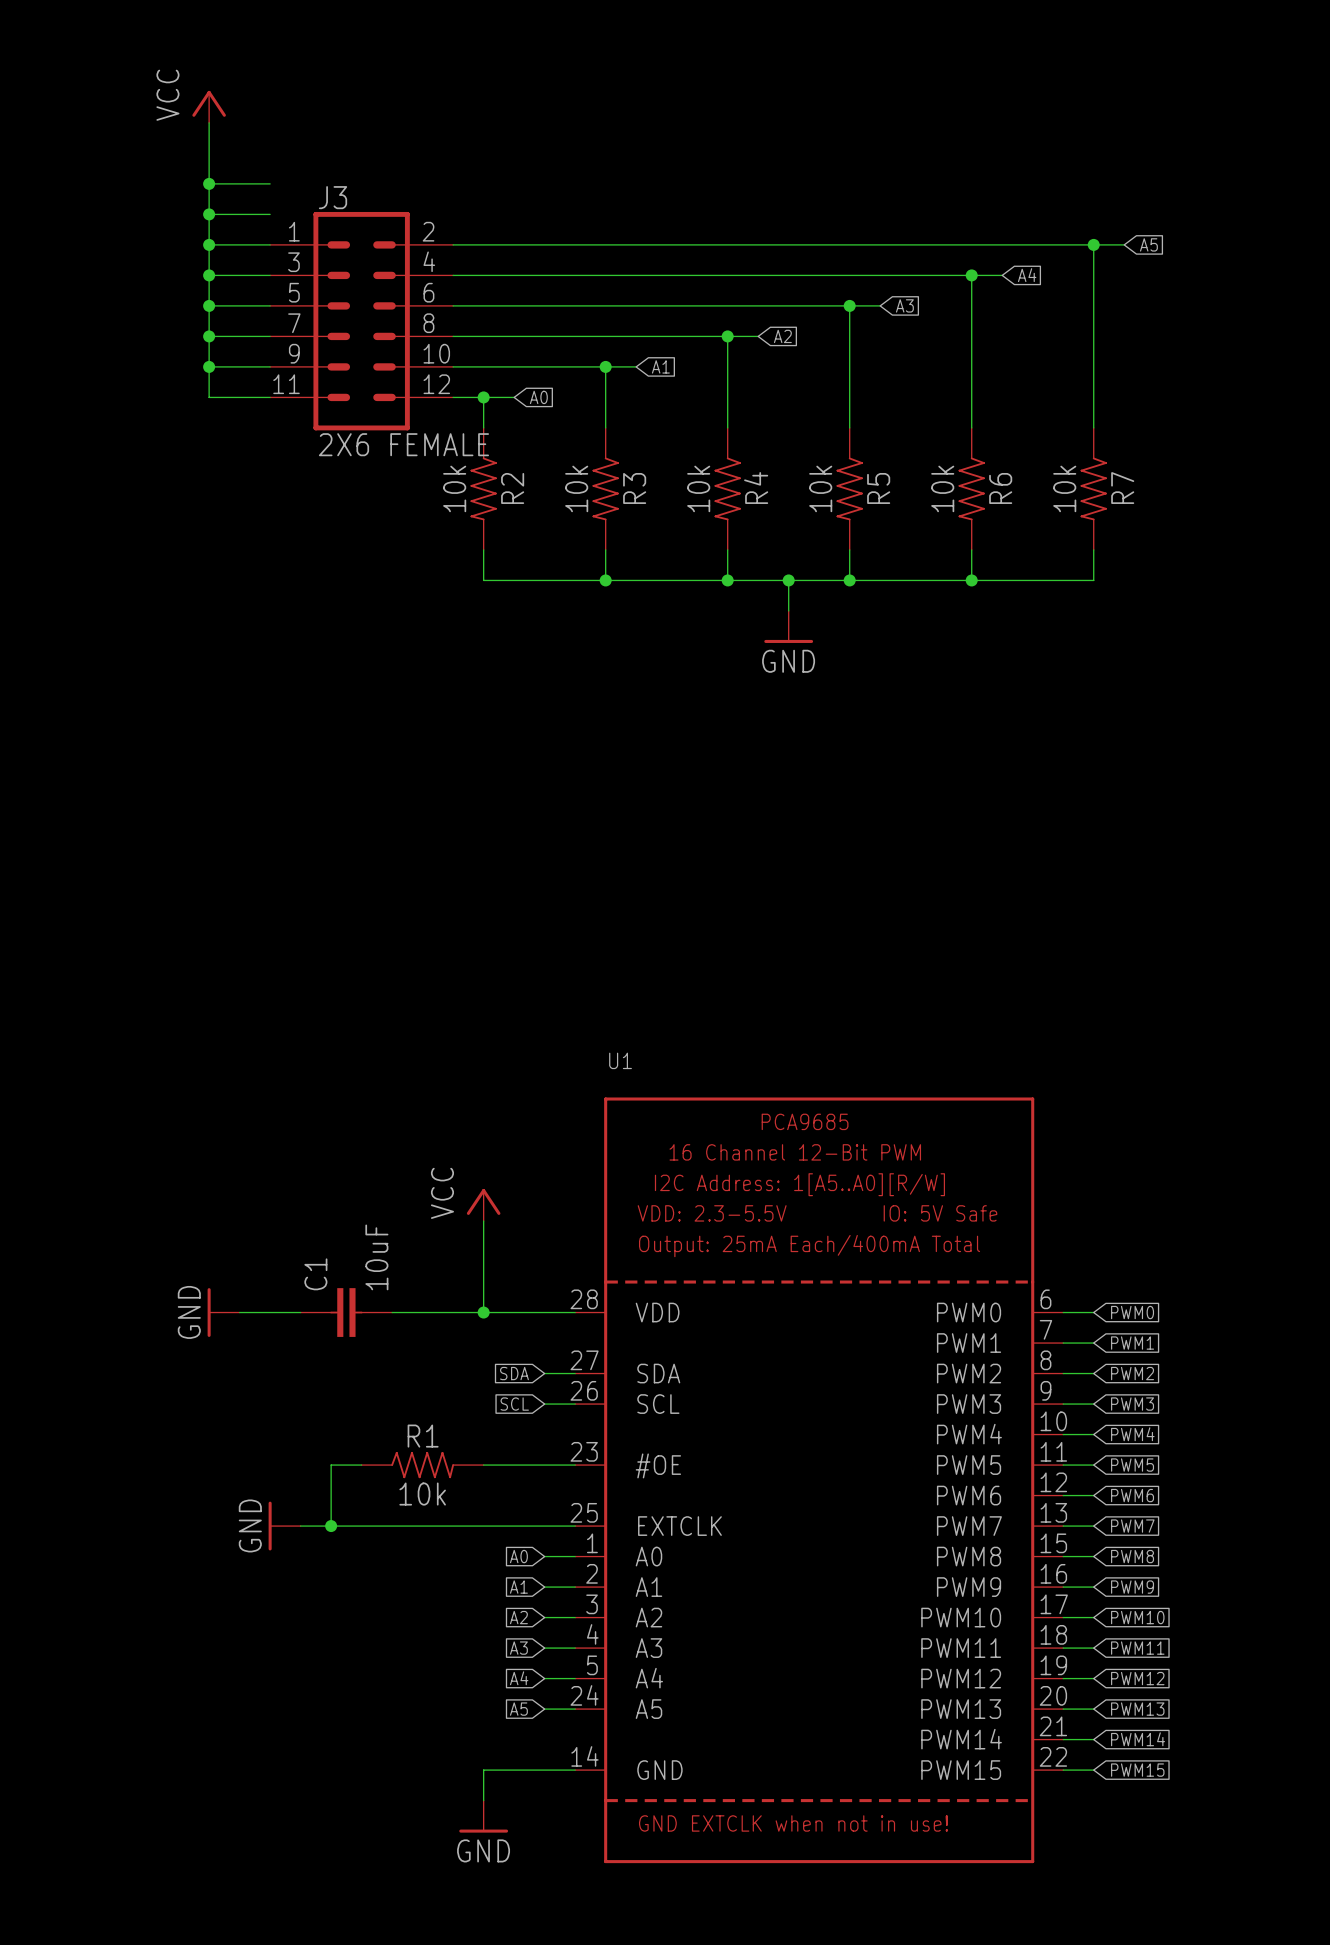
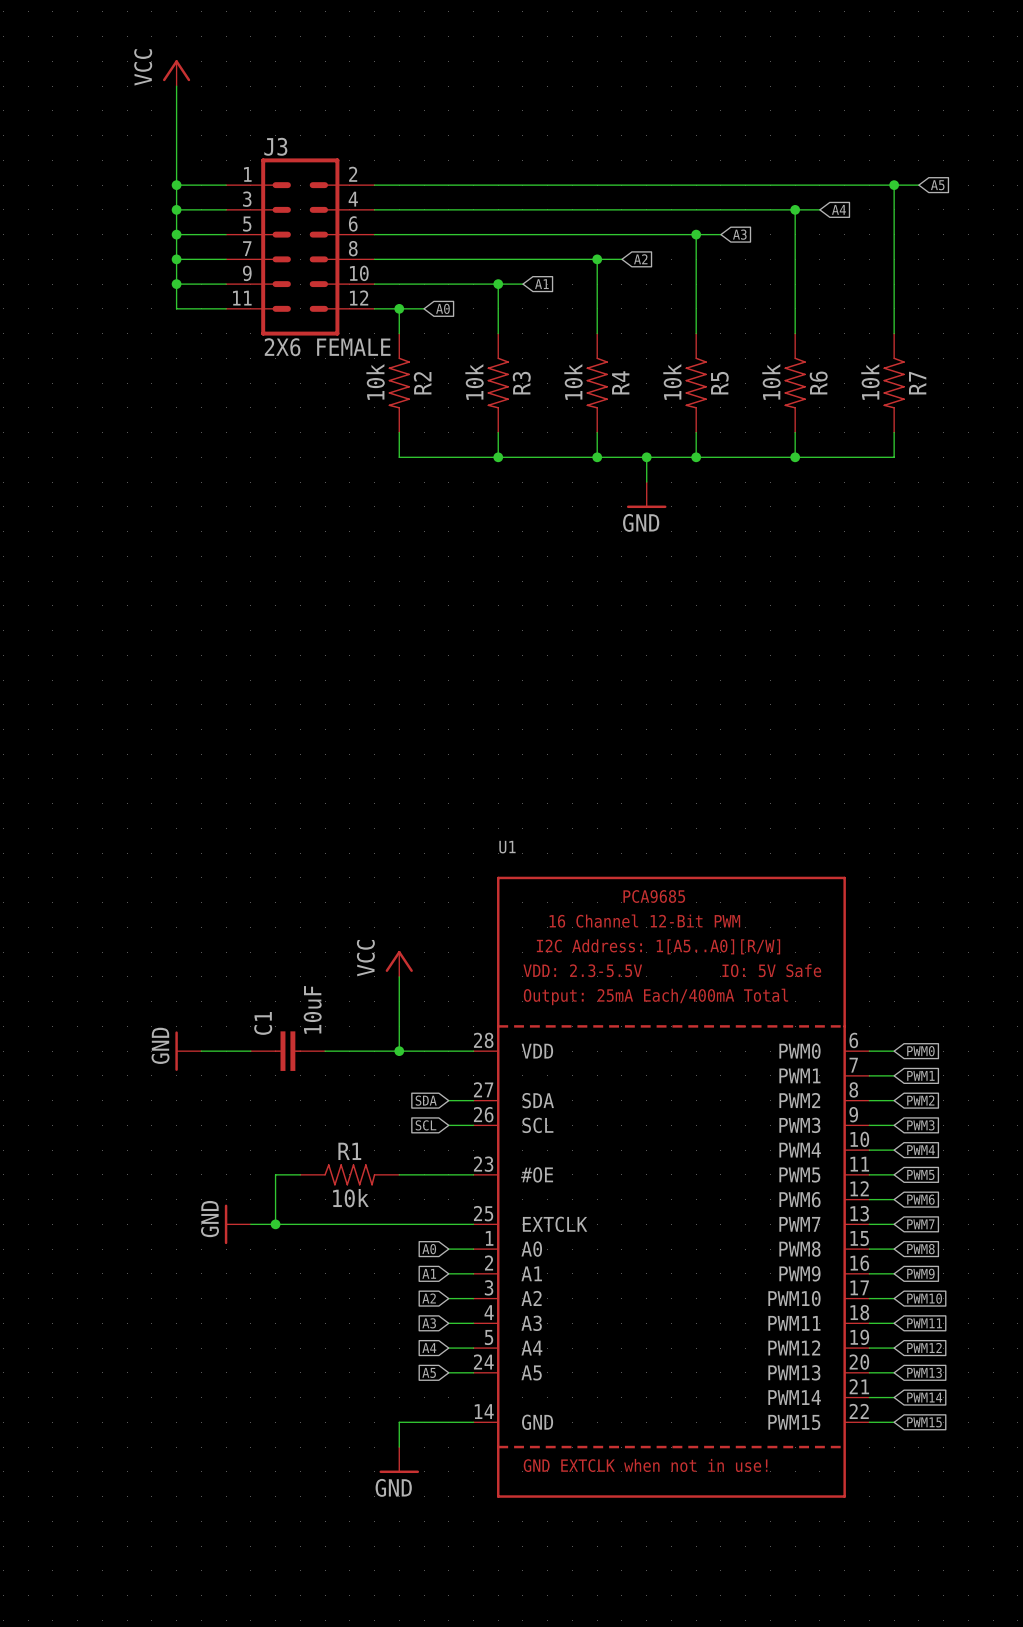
wire: (209, 183) (270, 183) -> none
junction: (209, 183) -> none
wire: (209, 214) (270, 214) -> none
junction: (209, 214) -> none

